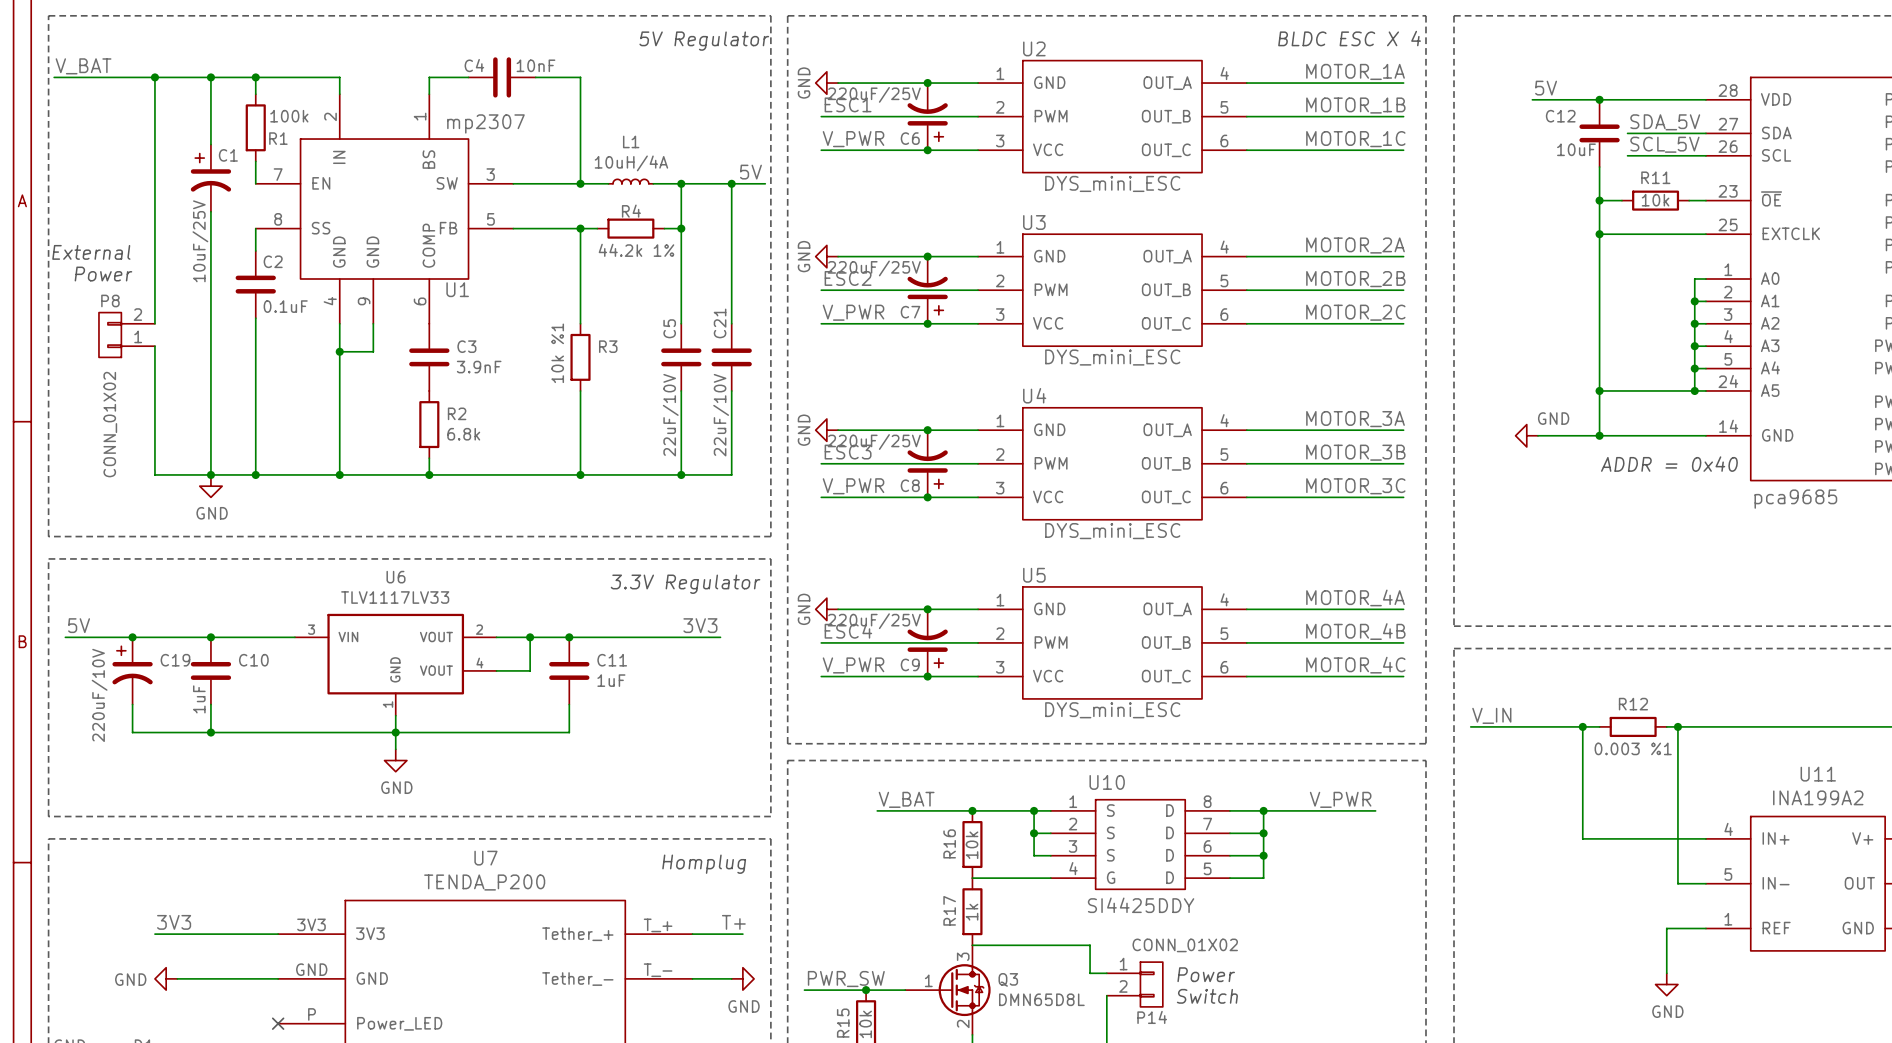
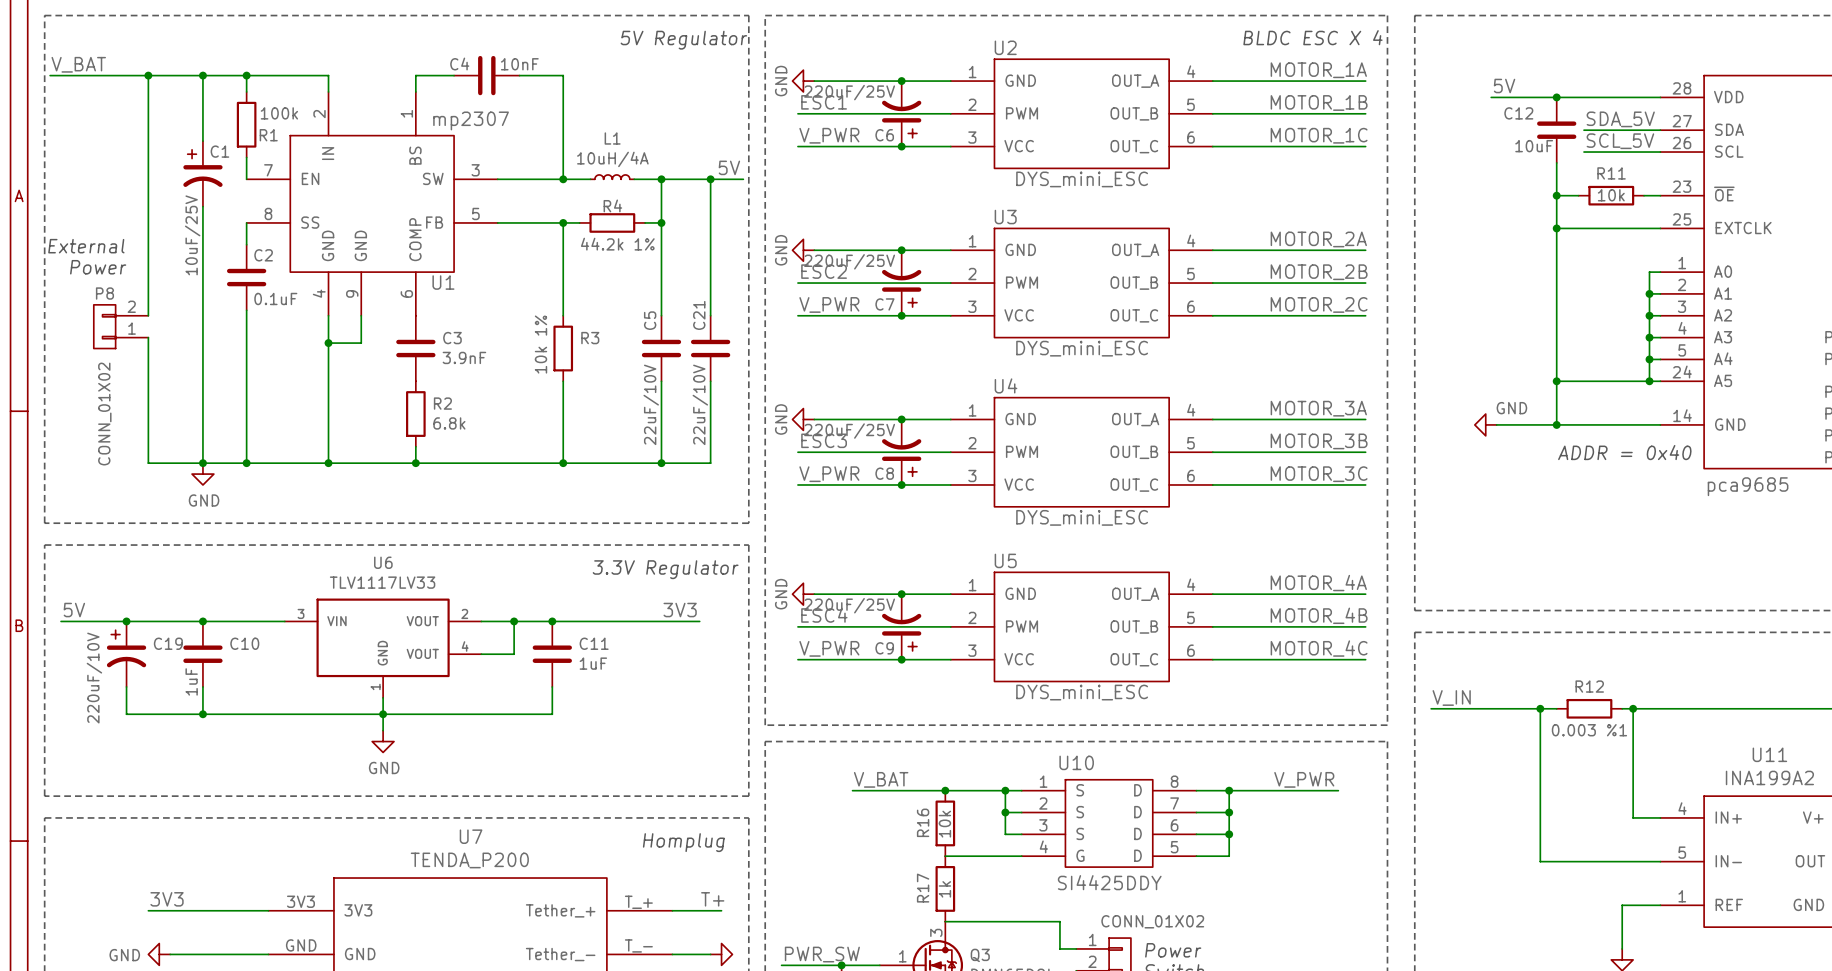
R3 value: 10k %1 (557, 353) -> 10k 1% (540, 344)
wire: (1582, 838) (1677, 838) (1677, 883) -> (1540, 817) (1540, 861) (1633, 861)

